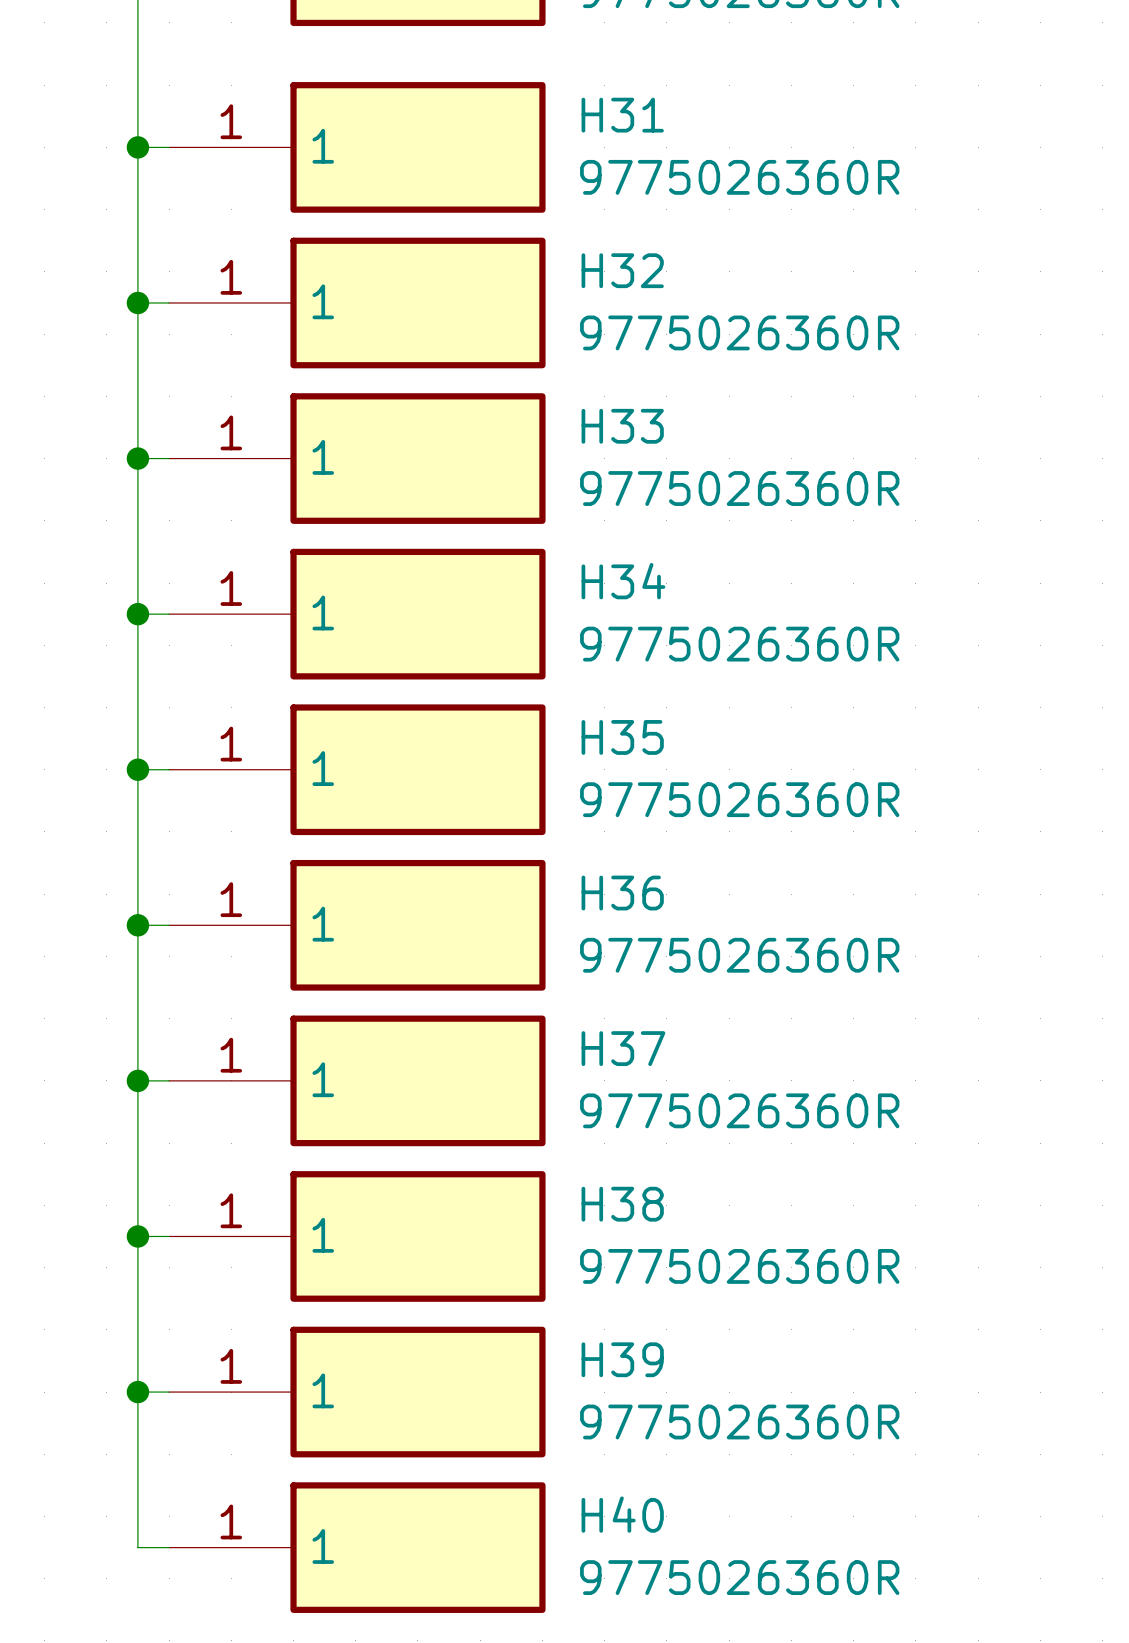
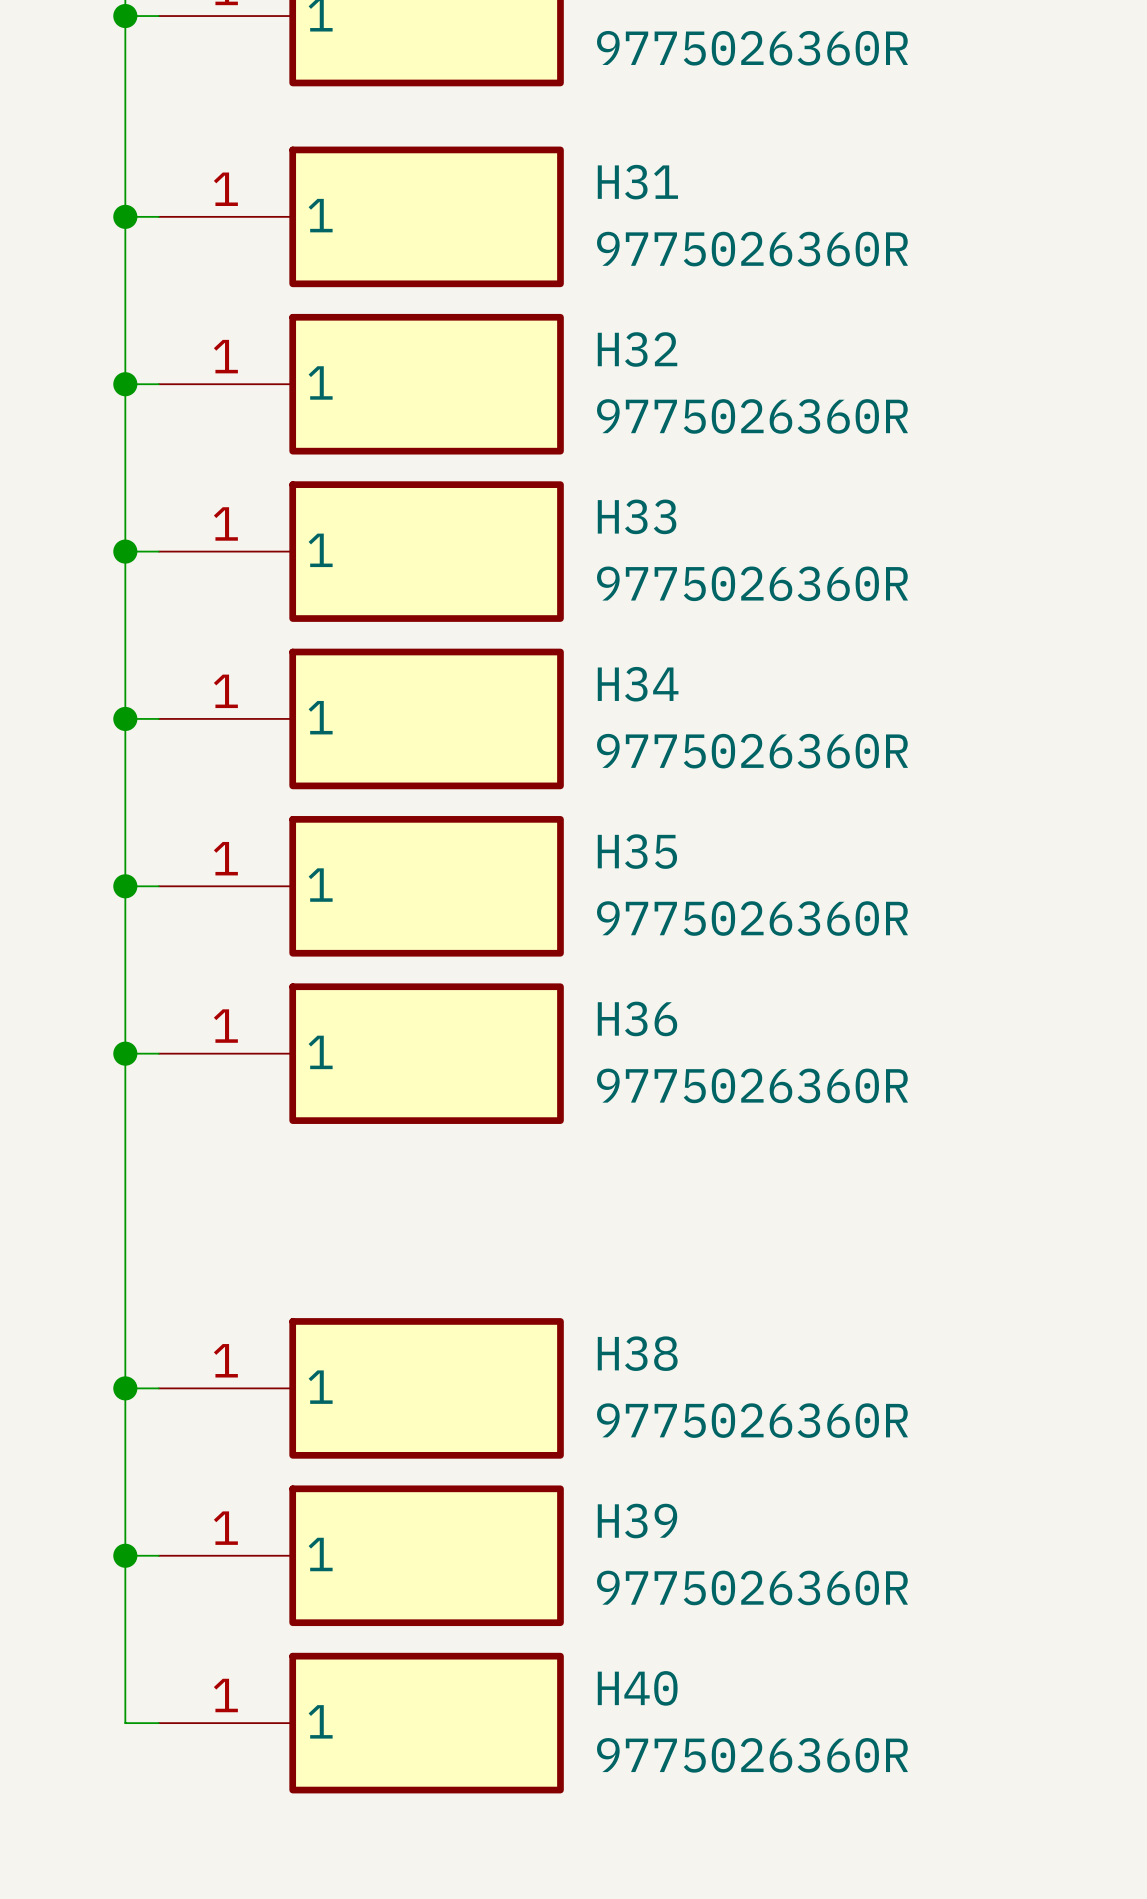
wire: (137, 1080) (169, 1080) -> none
junction: (137, 1080) -> none
H37: 9775026360R (357, 1080) -> none

